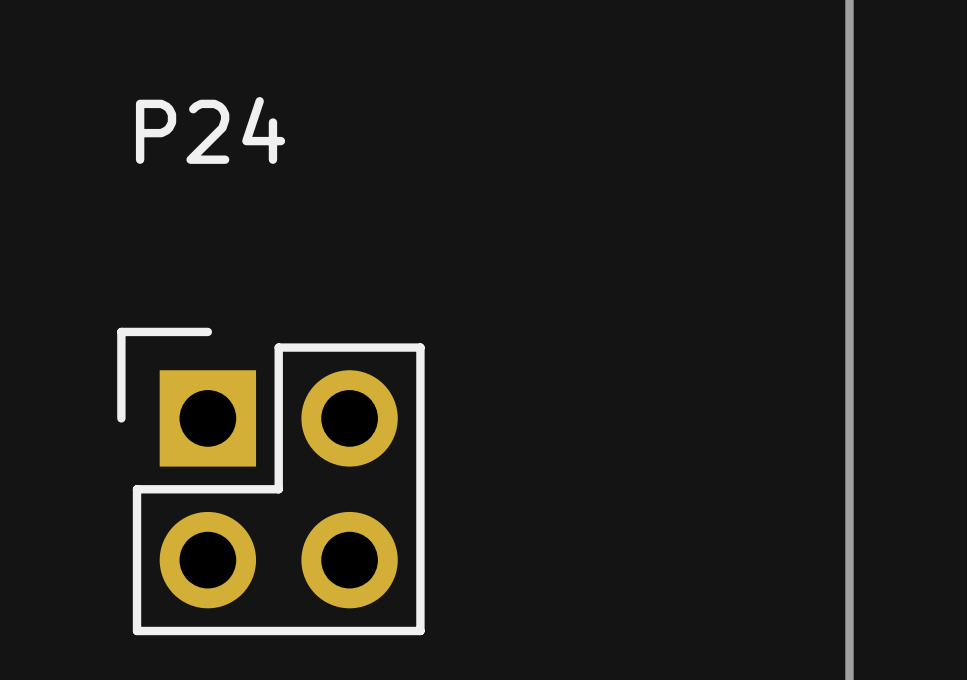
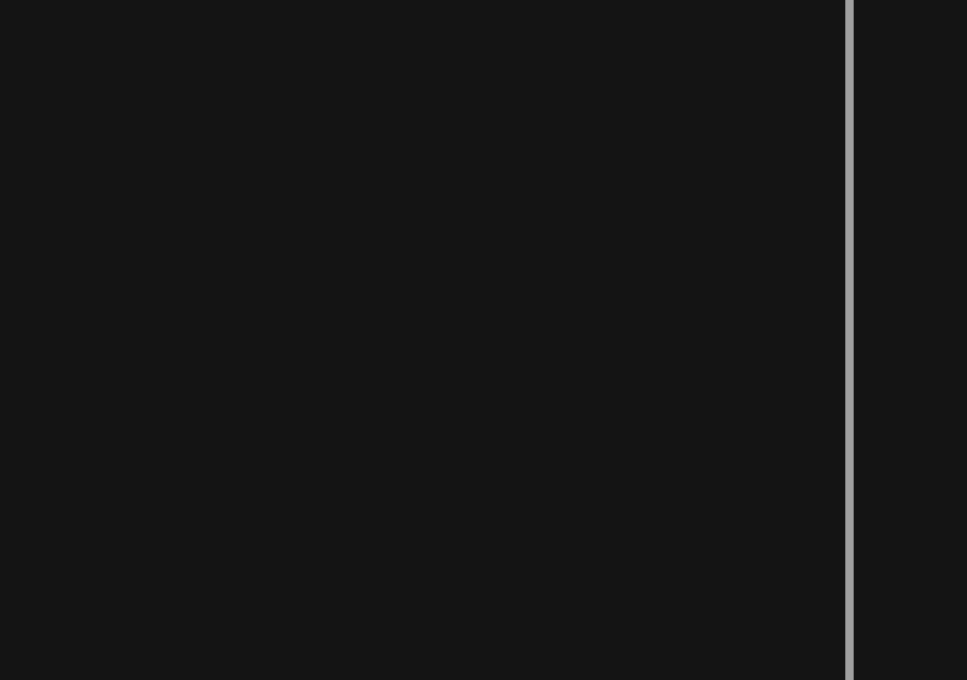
P24: (270, 481) -> none

